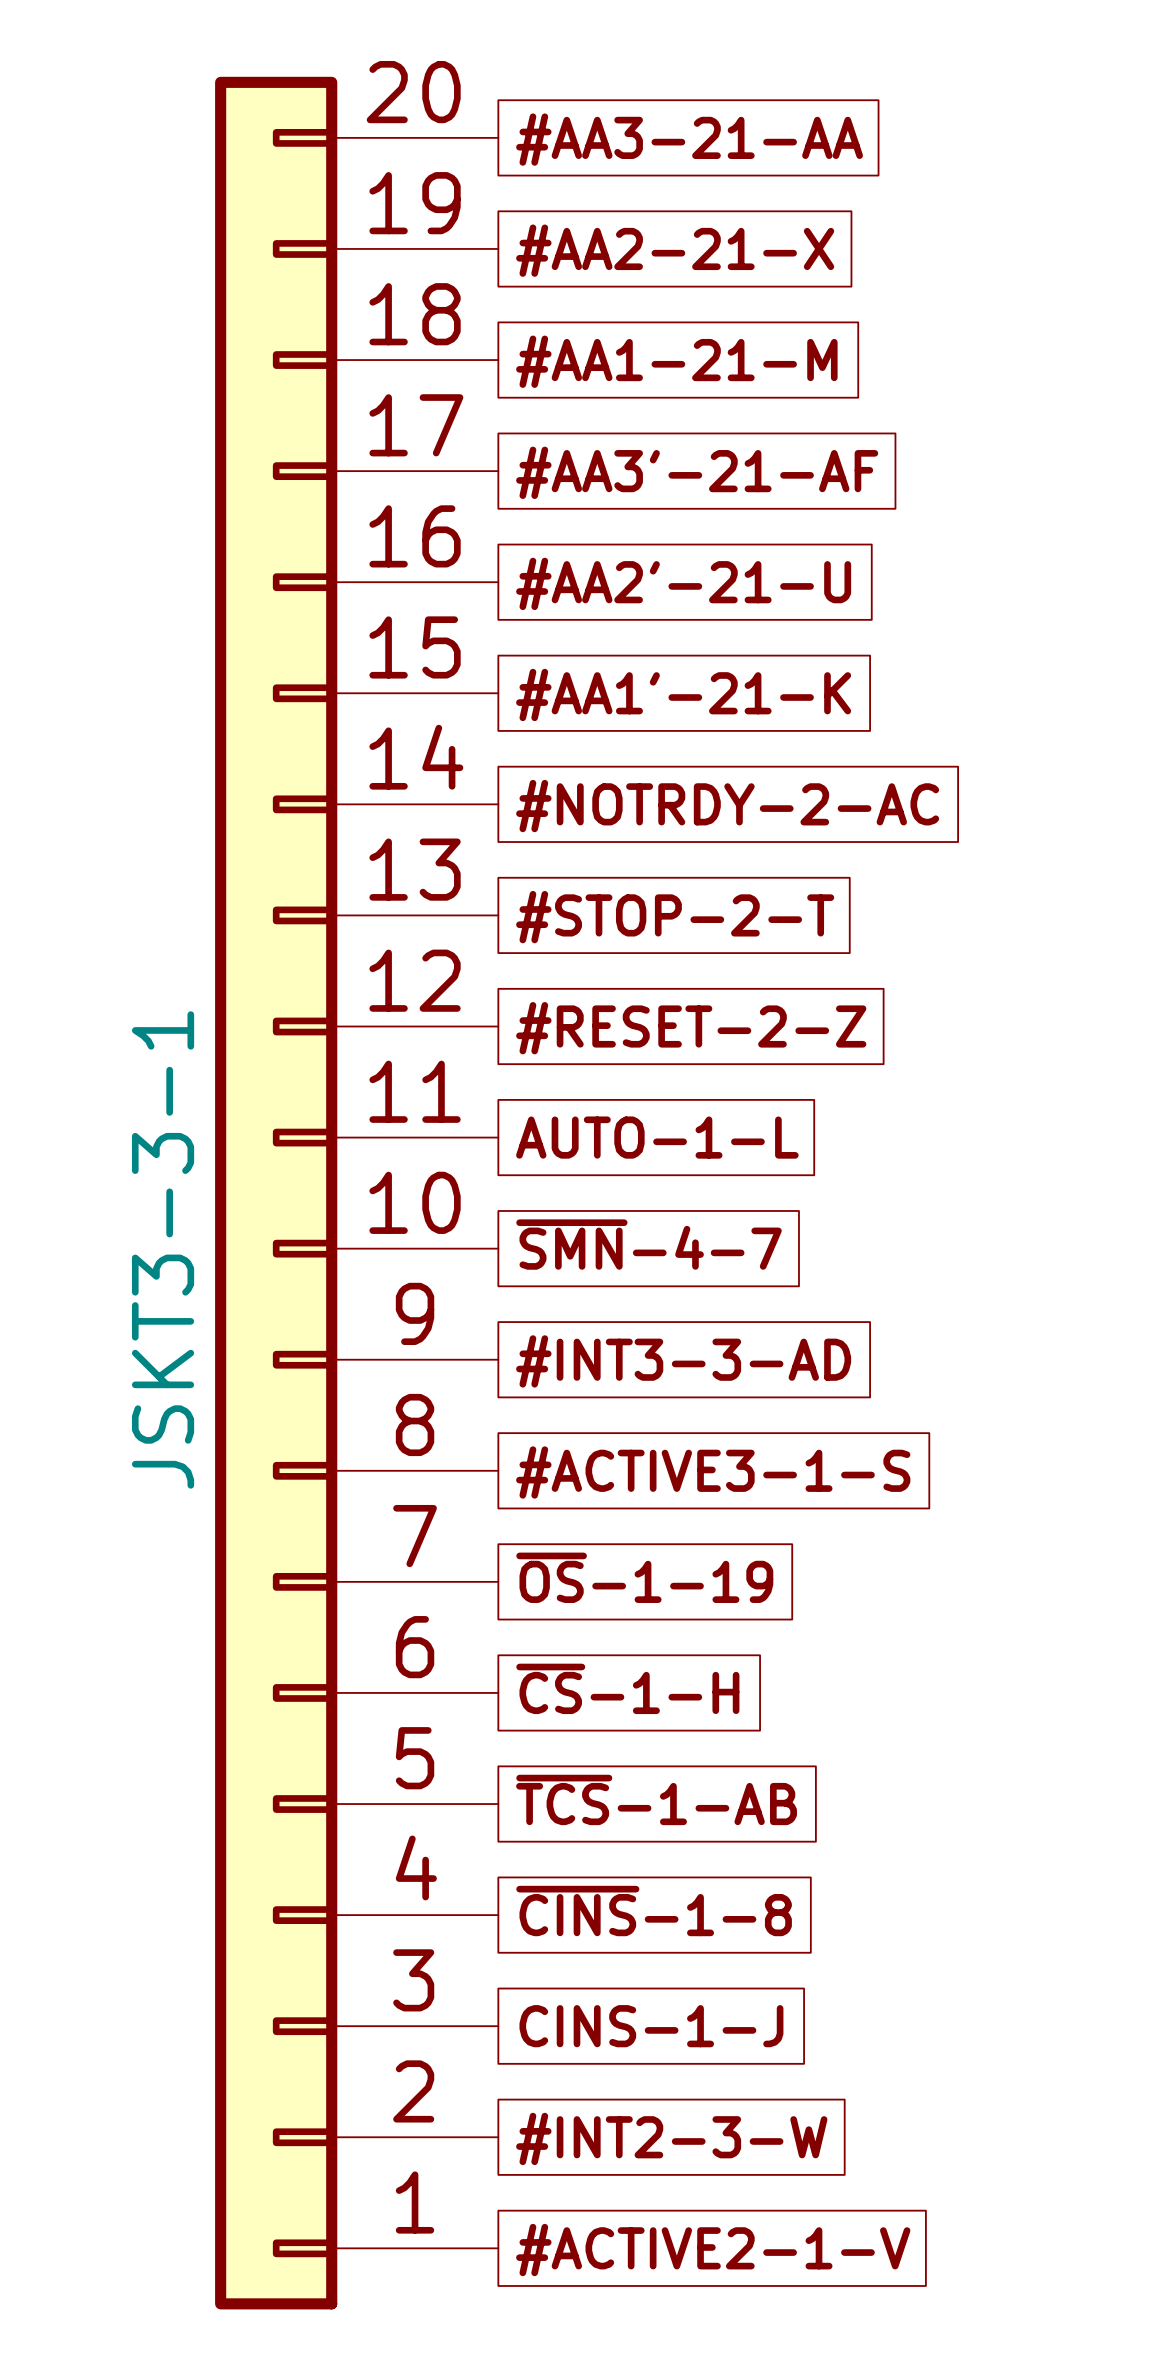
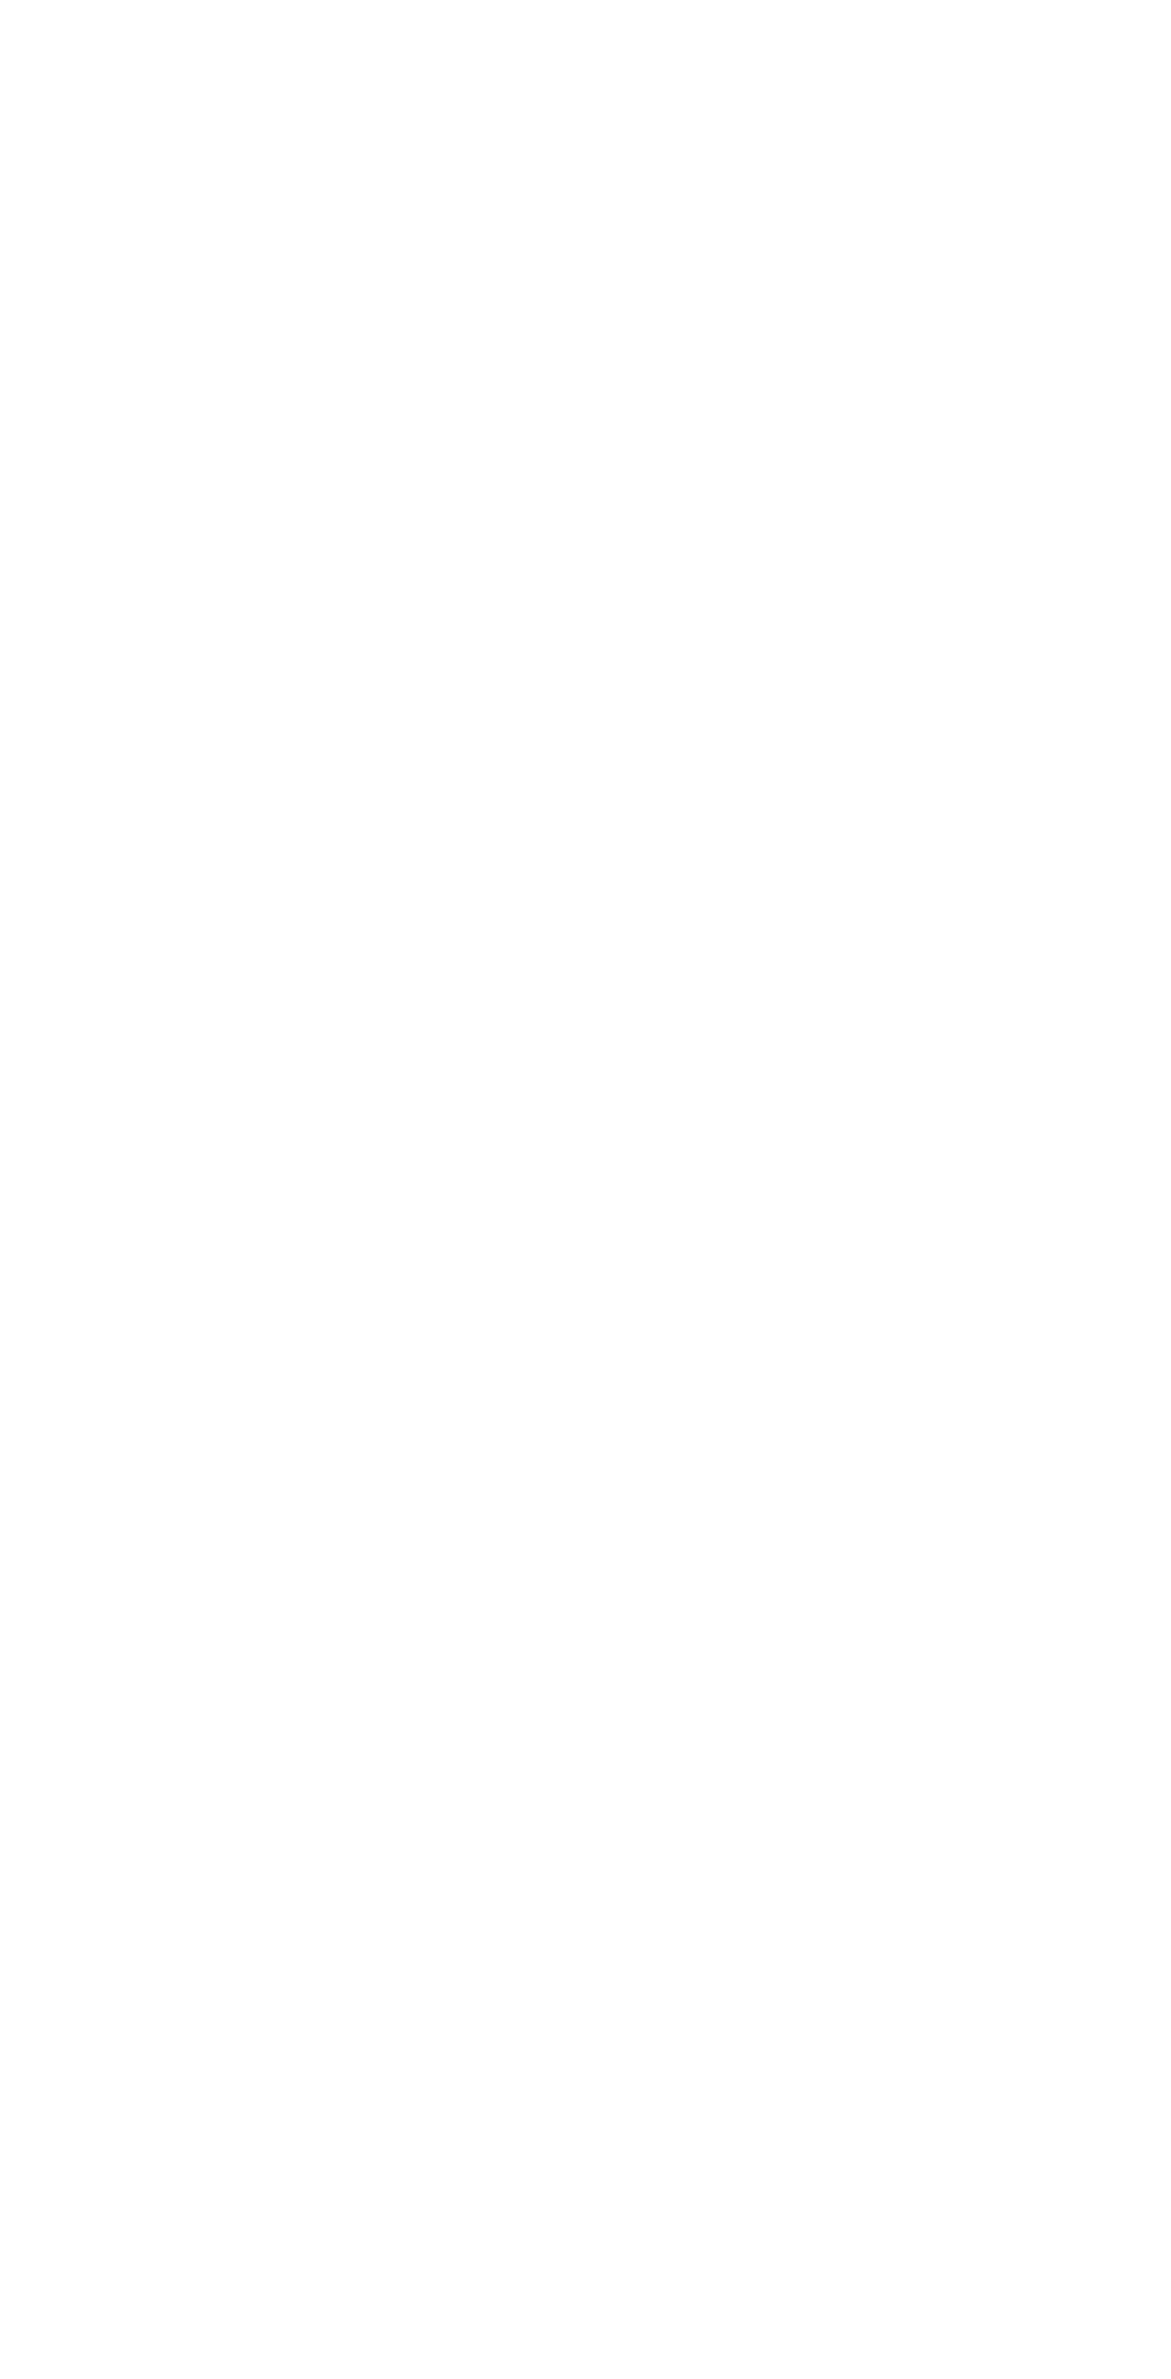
global label: #AA3-21-AA (689, 139) -> none
global label: #AA2-21-X (675, 250) -> none
global label: #AA1-21-M (676, 361) -> none
global label: #AA3'-21-AF (697, 472) -> none
global label: #AA2'-21-U (683, 583) -> none
global label: #AA1'-21-K (683, 694) -> none
global label: #NOTRDY-2-AC (727, 806) -> none
global label: #STOP-2-T (675, 917) -> none
global label: #RESET-2-Z (691, 1028) -> none
global label: AUTO-1-L (657, 1137) -> none
JSKT3-3-1: (356, 1193) -> none
global label: ~{SMN}-4-7 (649, 1244) -> none
global label: #INT3-3-AD (683, 1361) -> none
global label: #ACTIVE3-1-S (713, 1472) -> none
global label: ~{OS}-1-19 (644, 1577) -> none
global label: ~{CS}-1-H (627, 1688) -> none
global label: ~{TCS}-1-AB (656, 1799) -> none
global label: ~{CINS}-1-8 (654, 1911) -> none
global label: CINS-1-J (651, 2026) -> none
global label: #INT2-3-W (671, 2138) -> none
global label: #ACTIVE2-1-V (713, 2250) -> none

